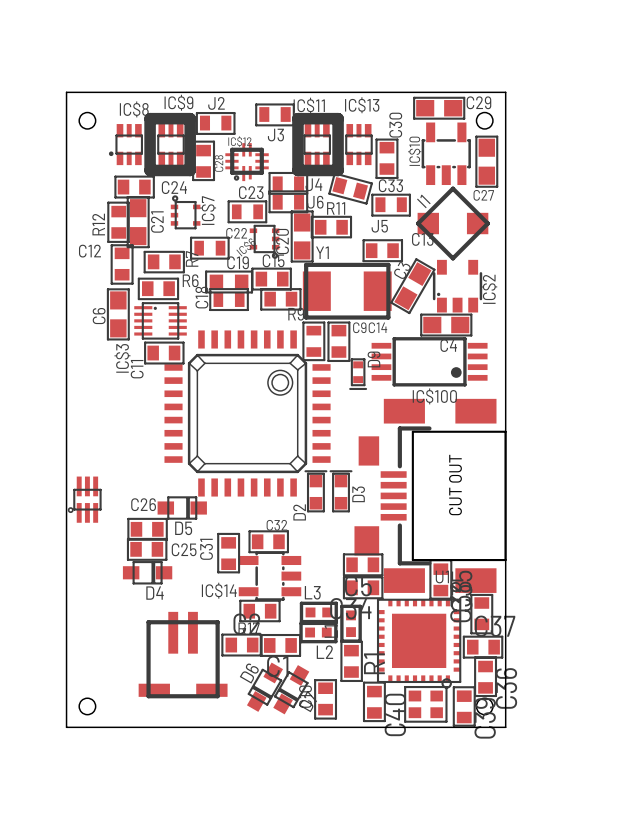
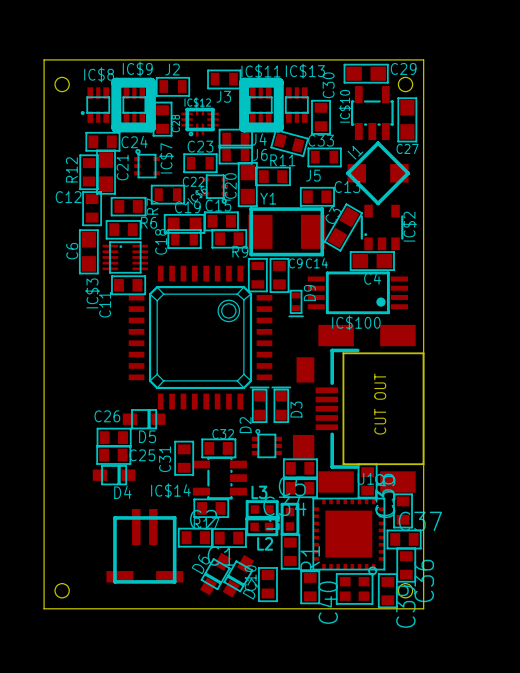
part: (84, 499) -> none
part: none -> (266, 443)

